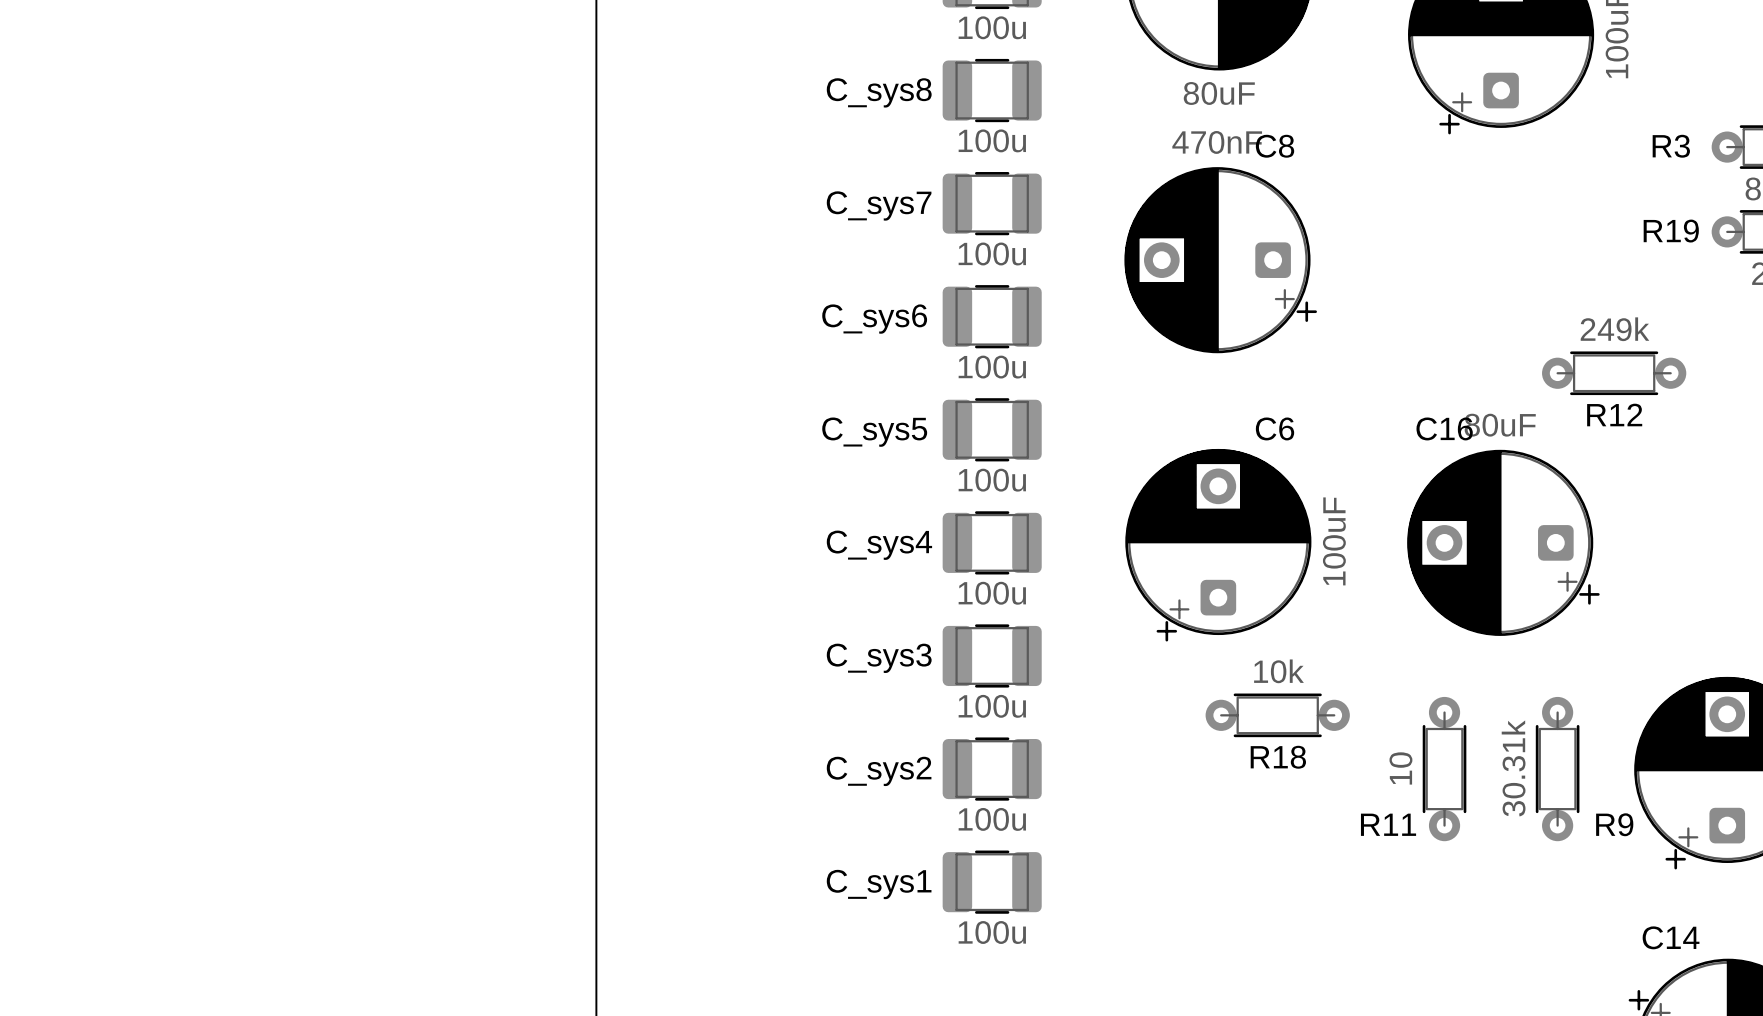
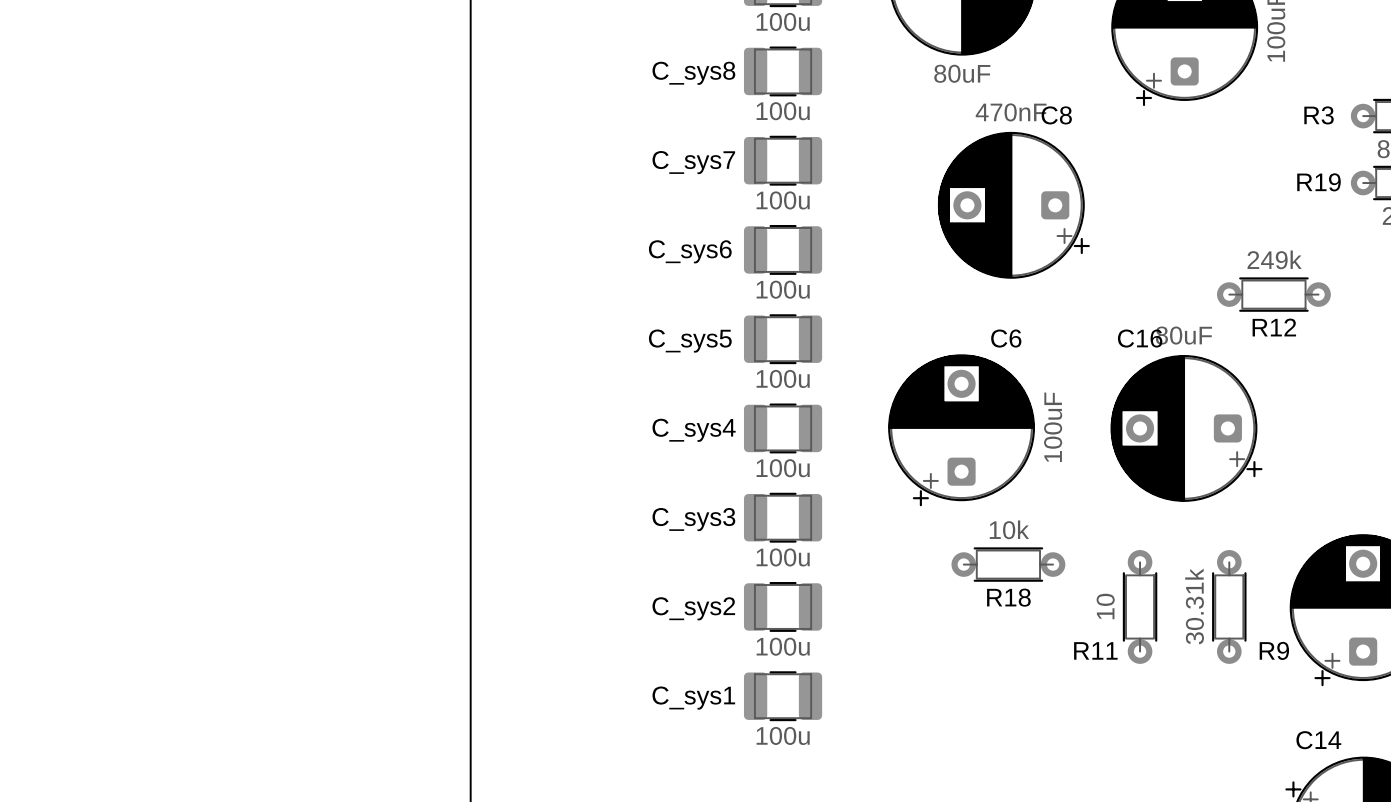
C8 position: (1220, 260) -> (1013, 205)

